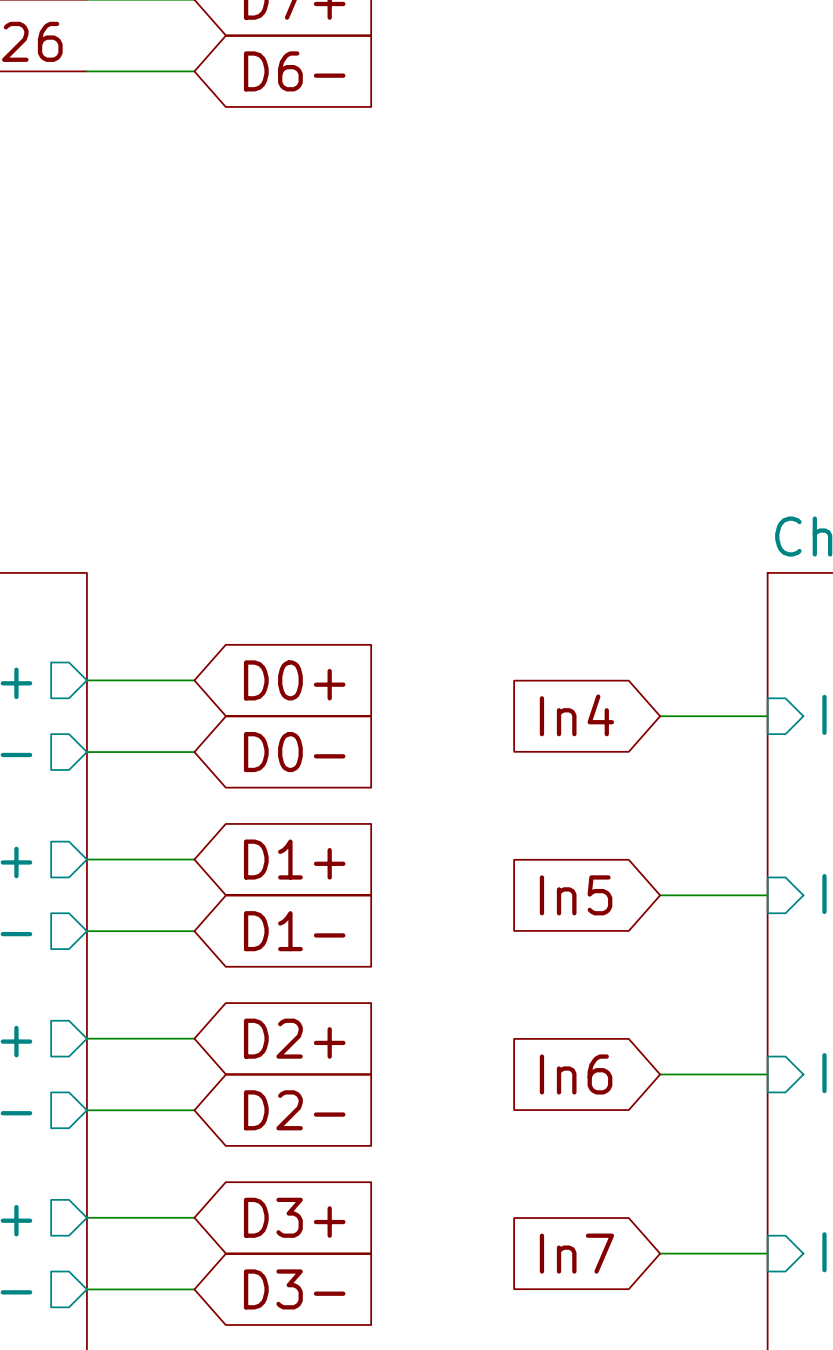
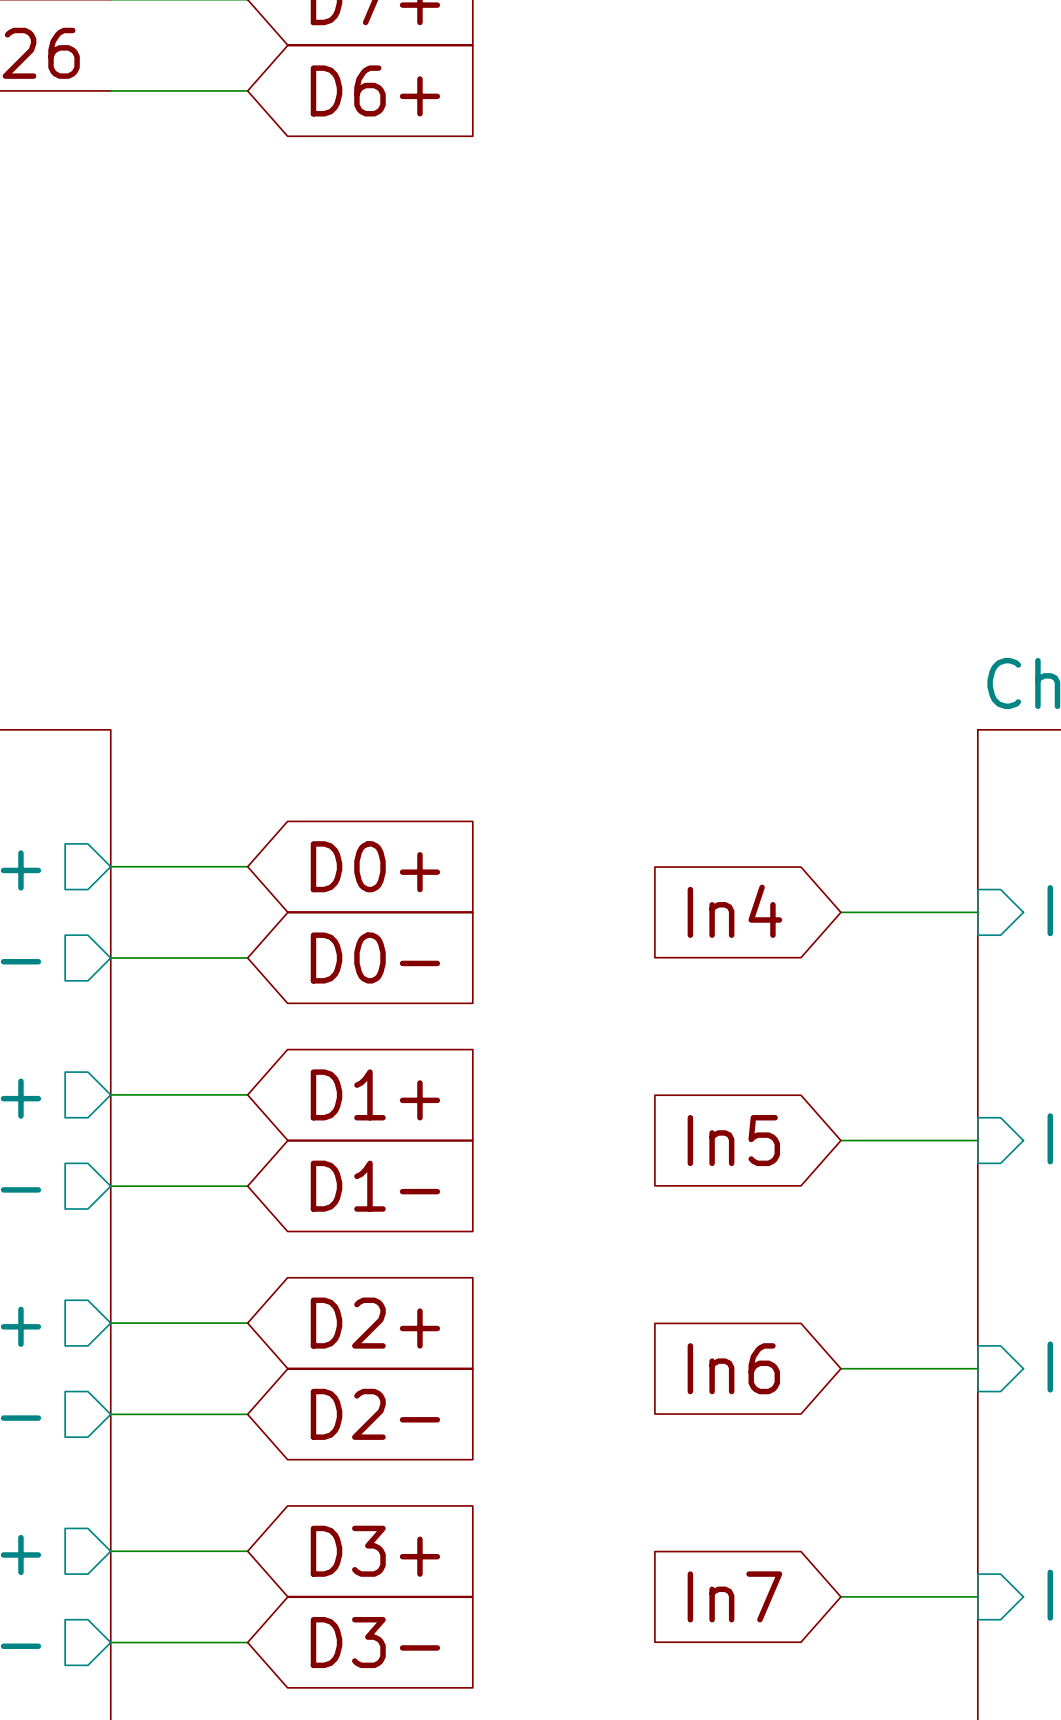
global label: D6- (294, 71) -> D6+ (375, 90)

